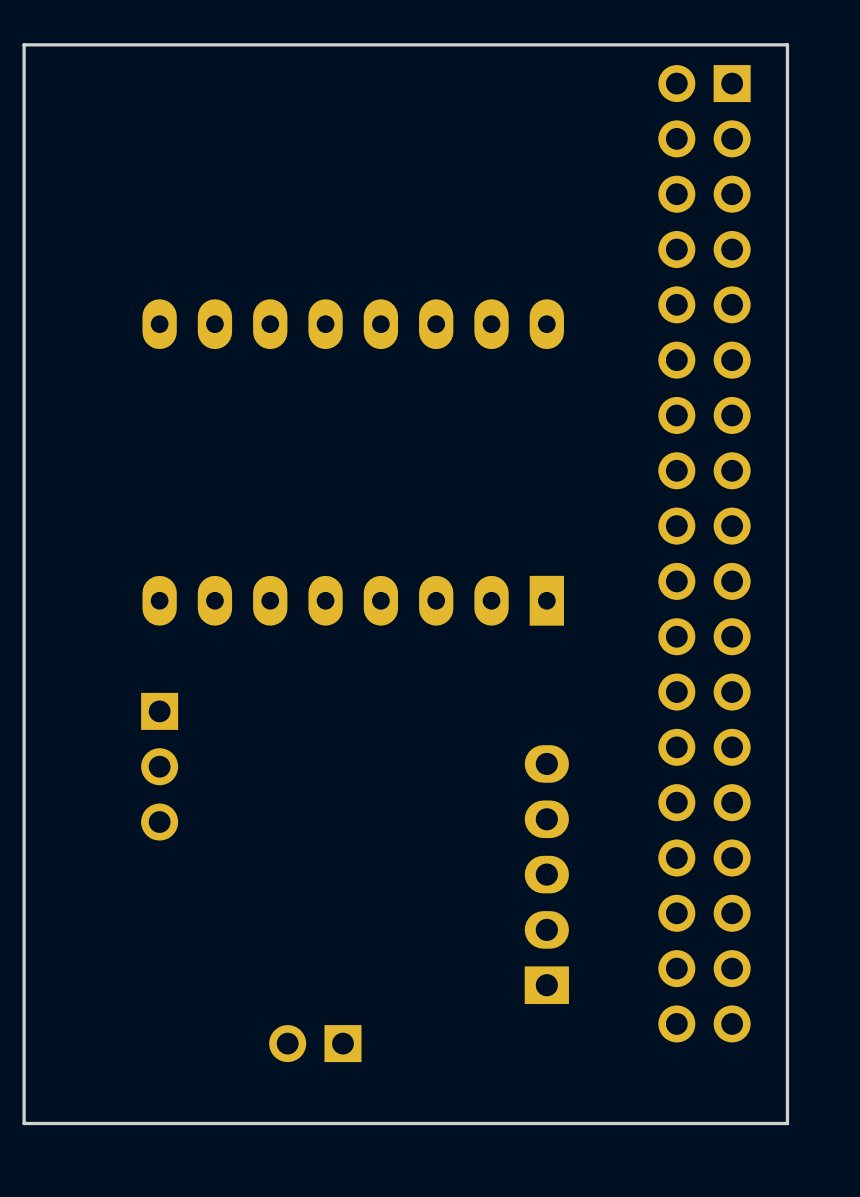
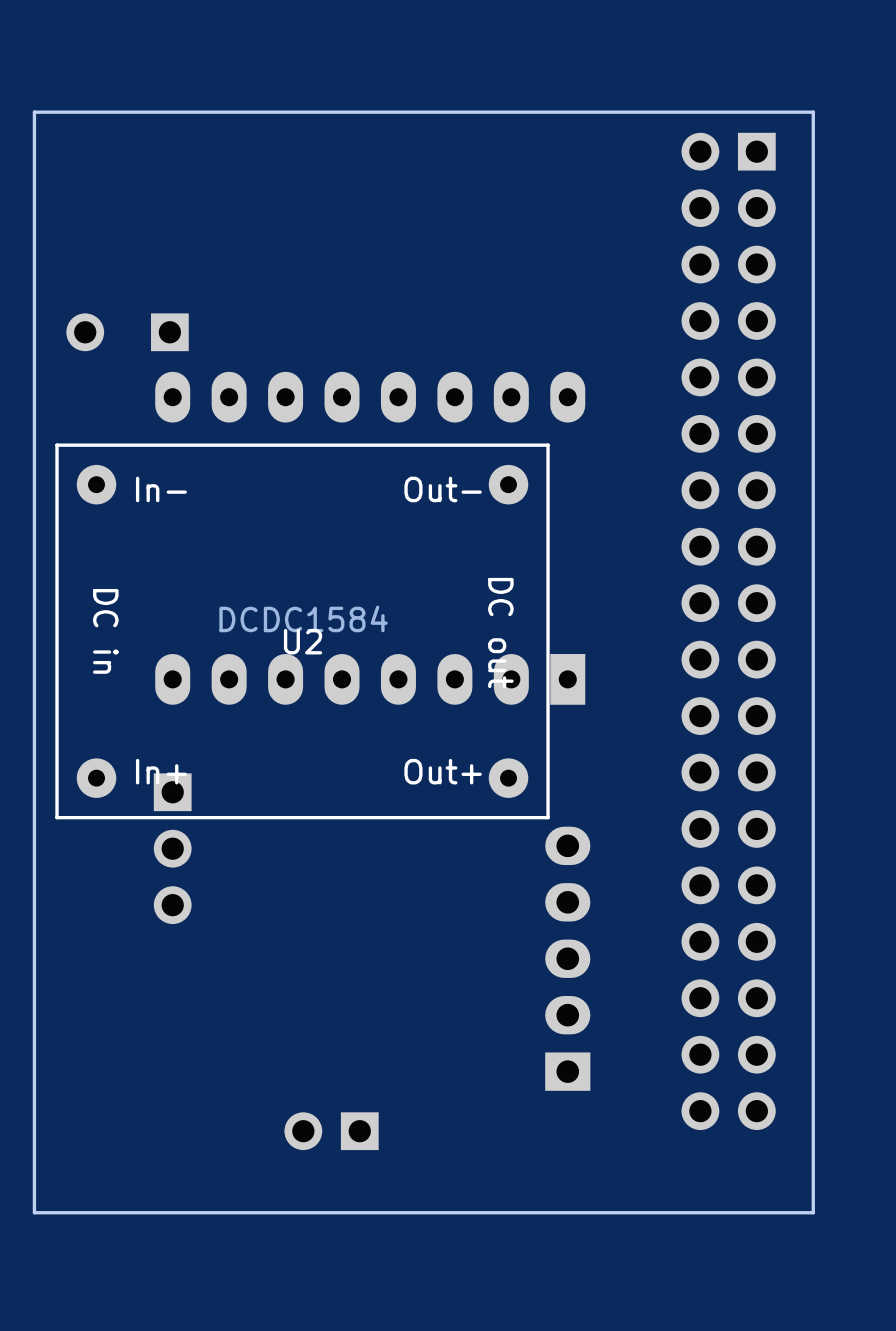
part: none -> (127, 332)
U2: none -> DCDC1584 (302, 631)

